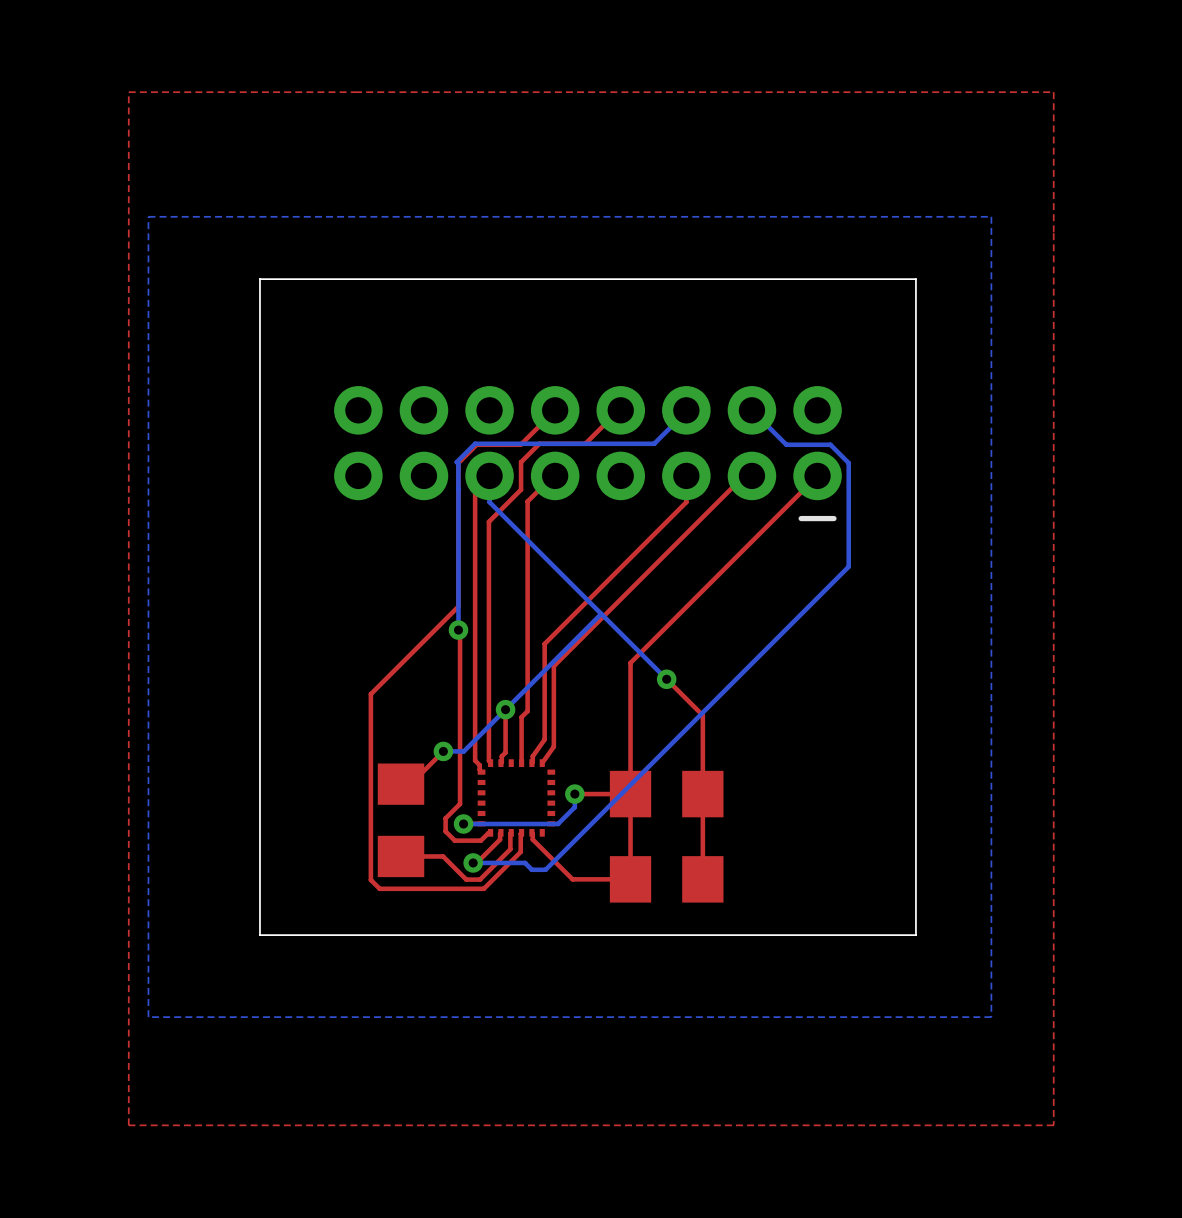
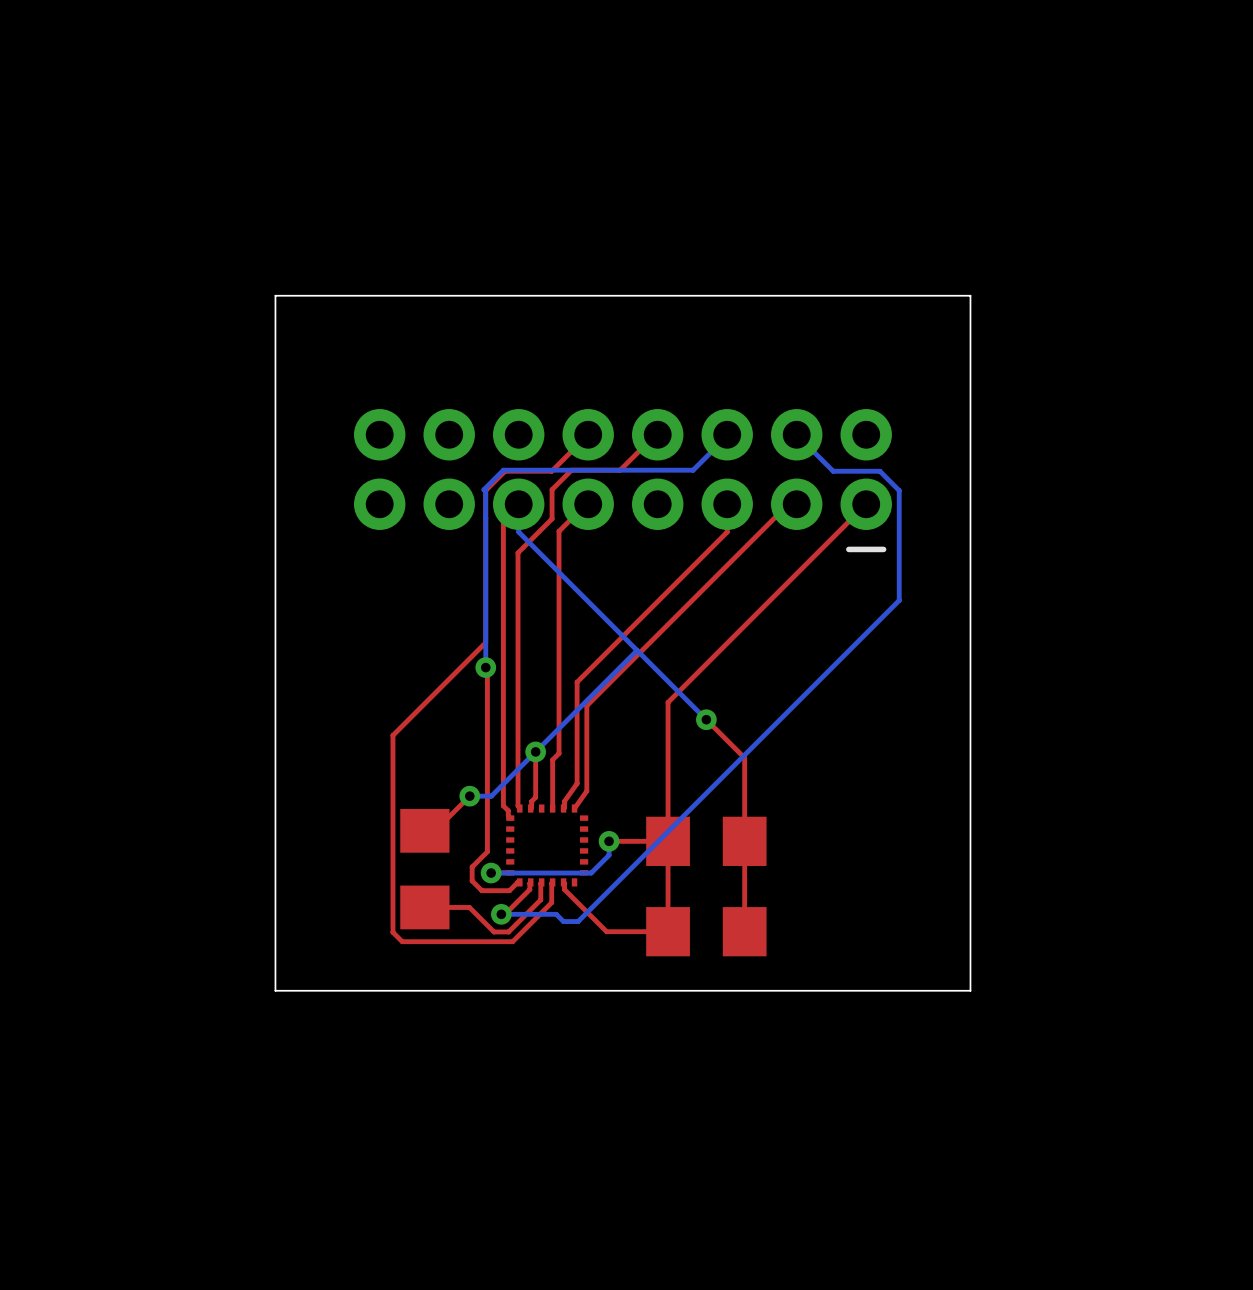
top zone outline: (1053, 92) (1053, 1125) (128, 1125) (128, 92) (1053, 92) -> none
bottom zone outline: (991, 216) (991, 1017) (148, 1017) (148, 216) (991, 216) -> none

